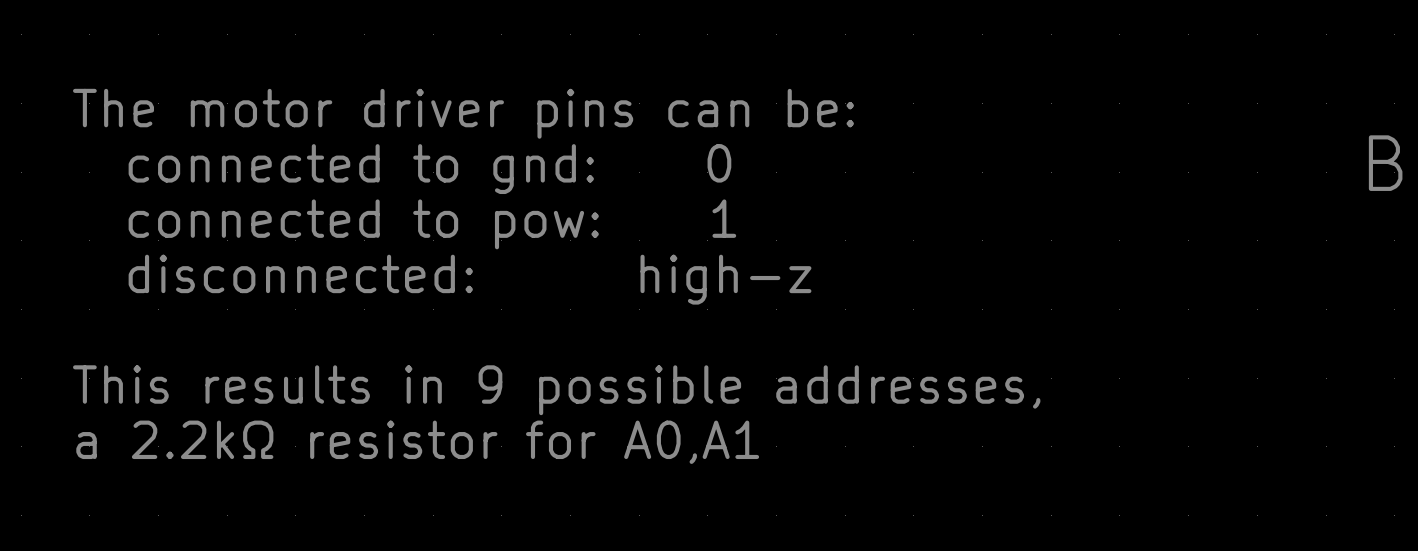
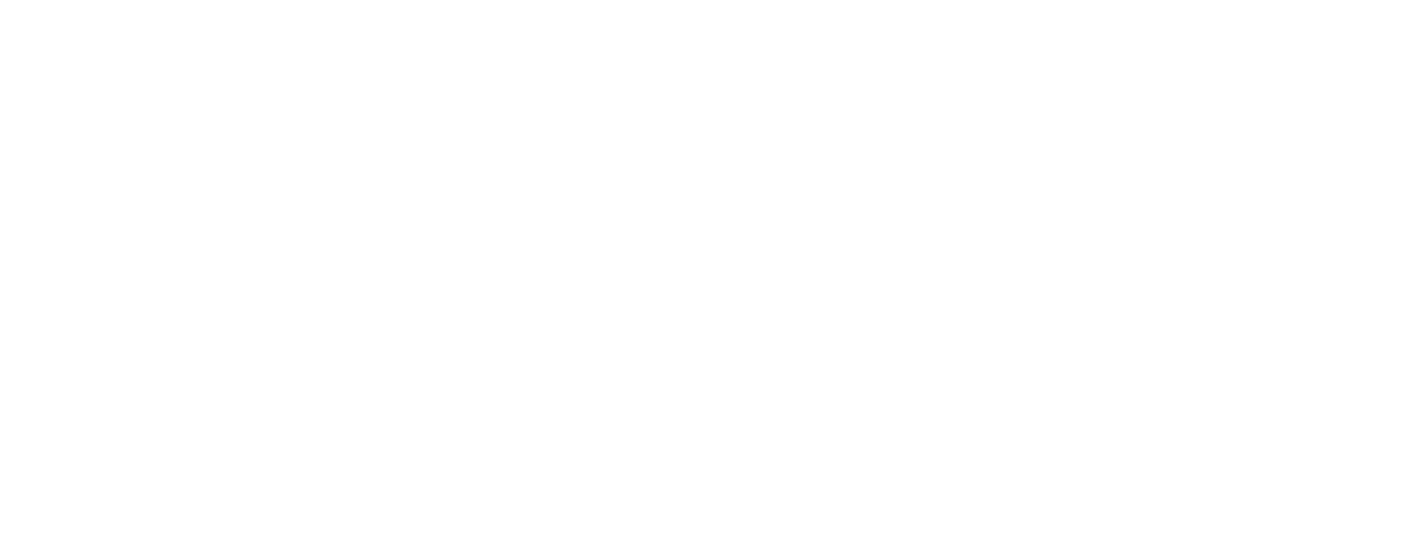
text: The motor driver pins can be: (463, 113) -> none
text: connected to gnd: 0 (429, 169) -> none
text: connected to pow: 1 (432, 224) -> none
text: disconnected: high-z (470, 279) -> none
text: This results in 9 possible addresses, (556, 390) -> none
text: a 2.2kΩ resistor for A0,A1 (417, 442) -> none

